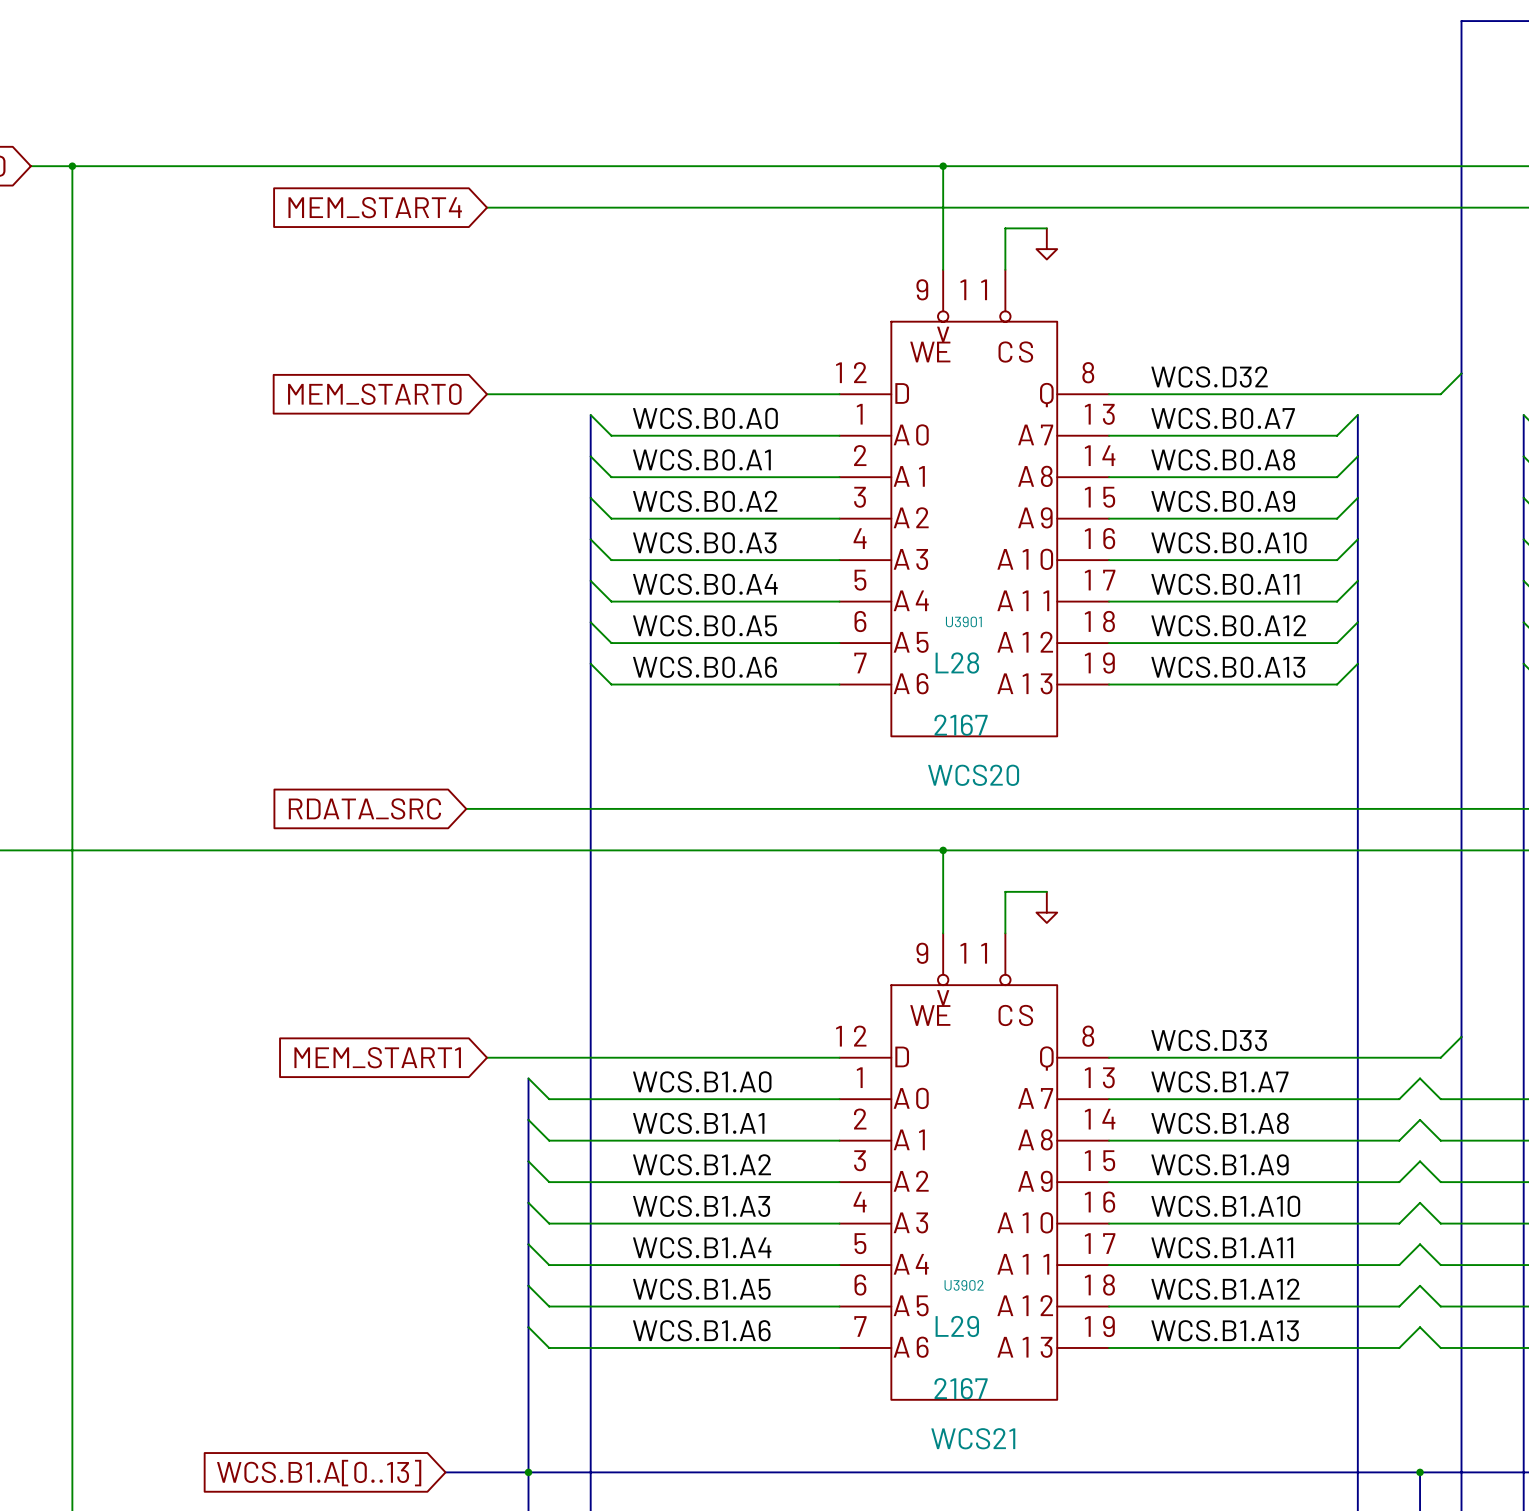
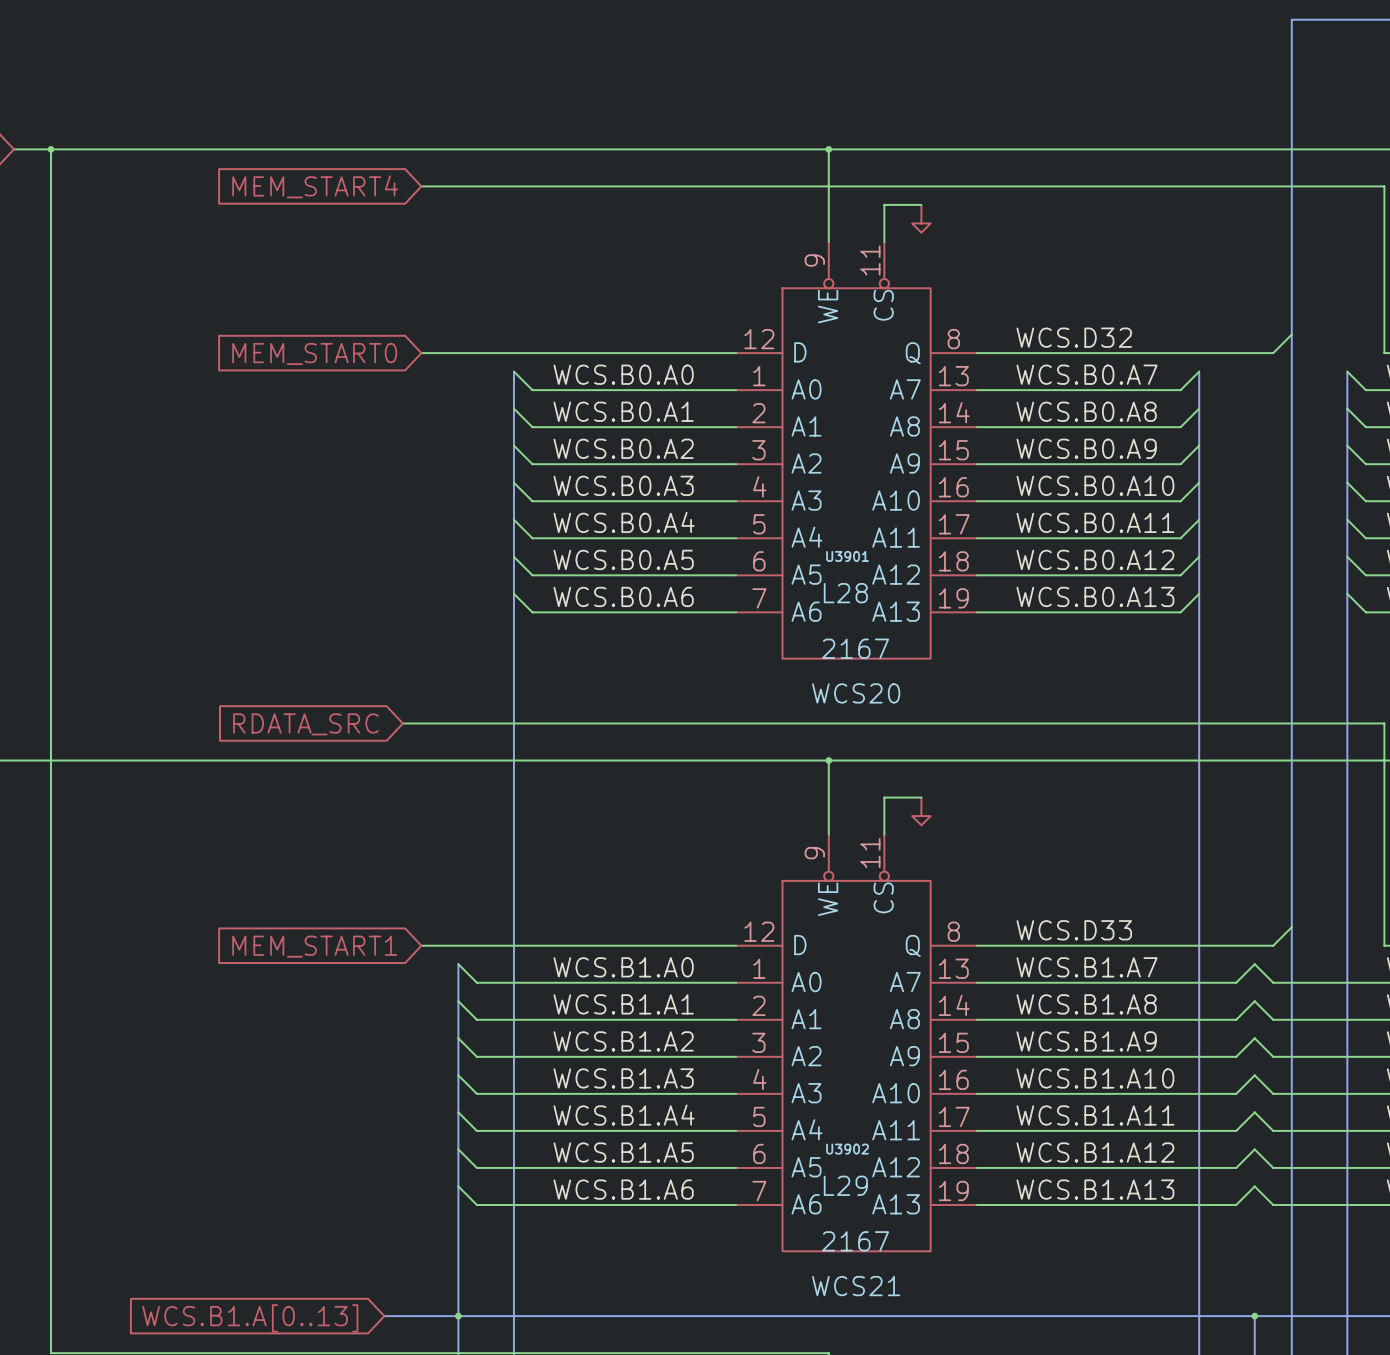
U3901 symbol: [839, 269, 1110, 737] -> [736, 241, 977, 659]
U3902 symbol: [839, 933, 1110, 1400] -> [736, 834, 977, 1252]

